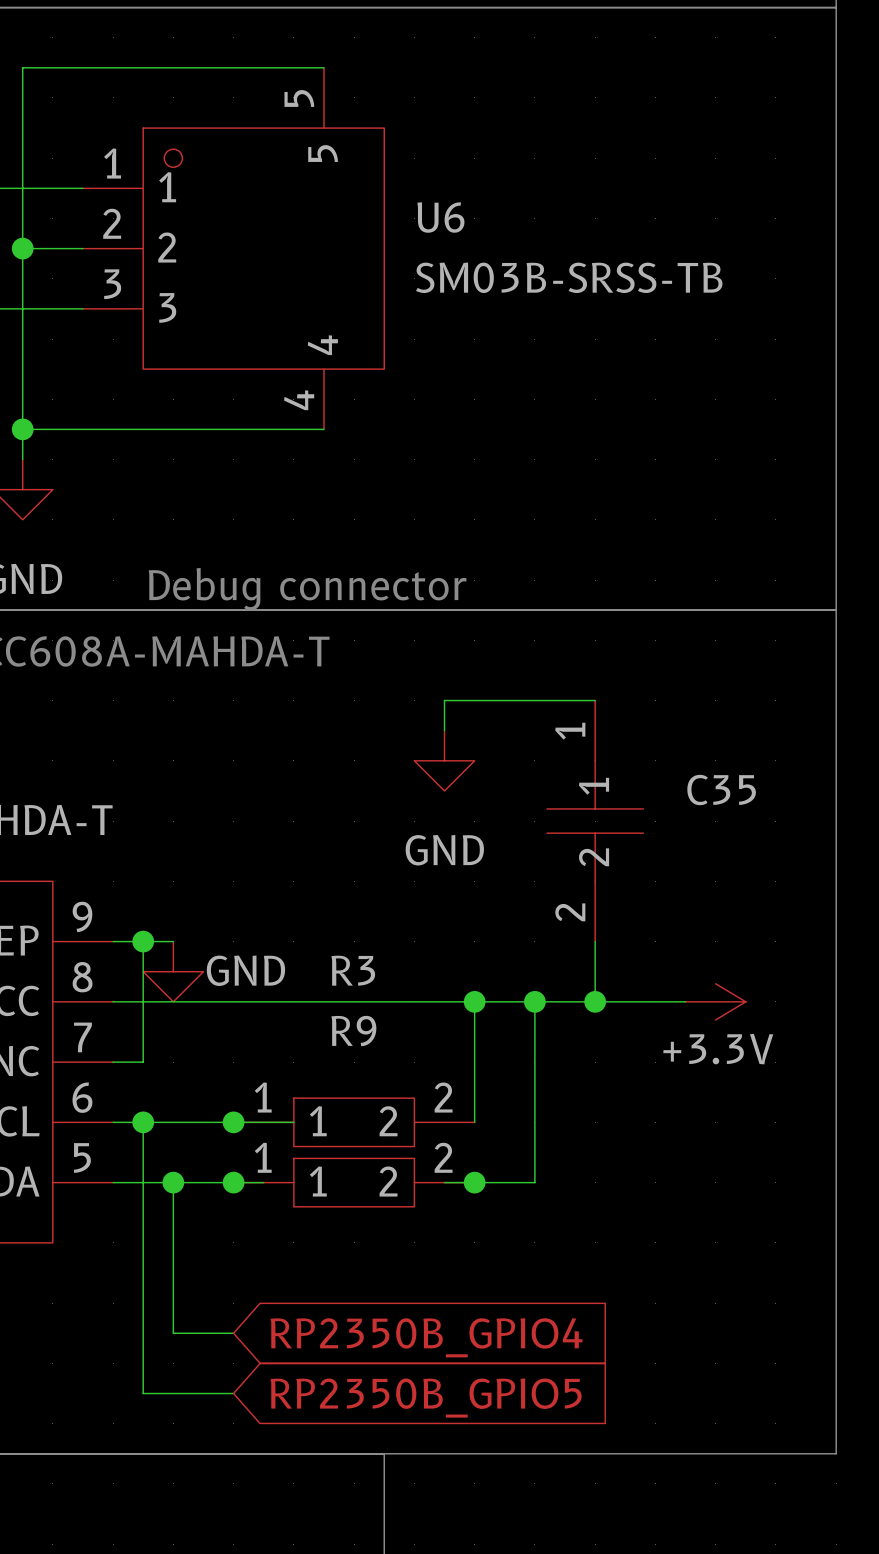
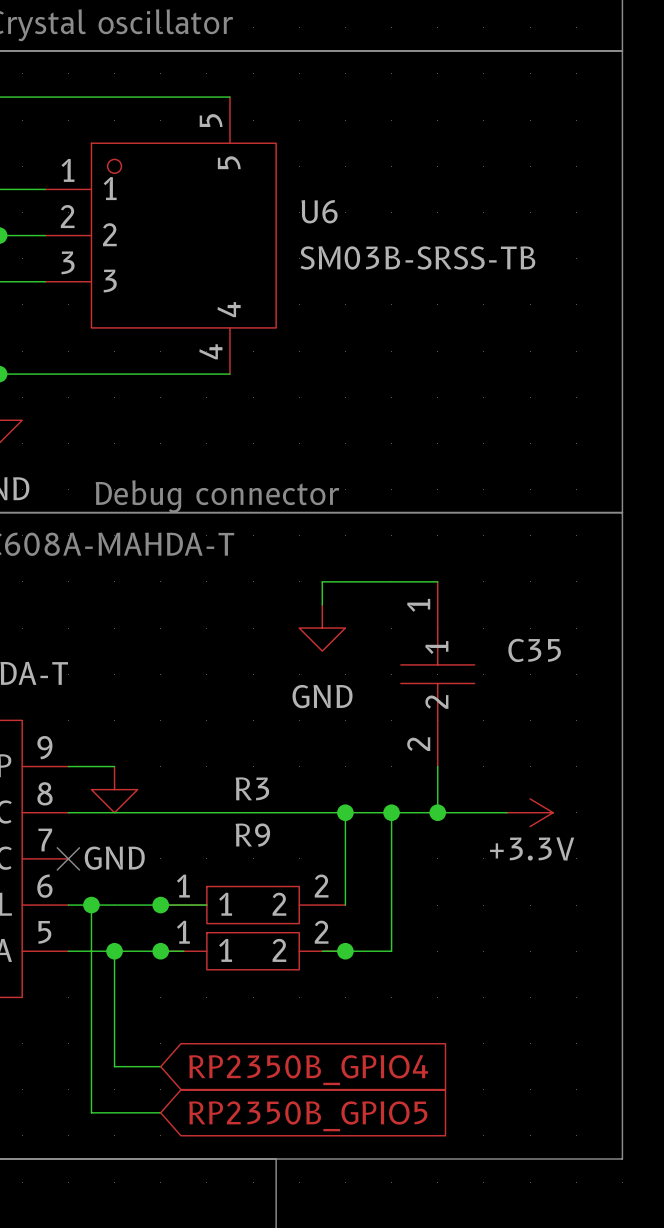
wire: (143, 941) (143, 1062) (113, 1062) -> none
junction: (143, 941) -> none
power symbol text position: GND (245, 970) -> GND (114, 858)
no-connect mark: none -> (68, 858)

